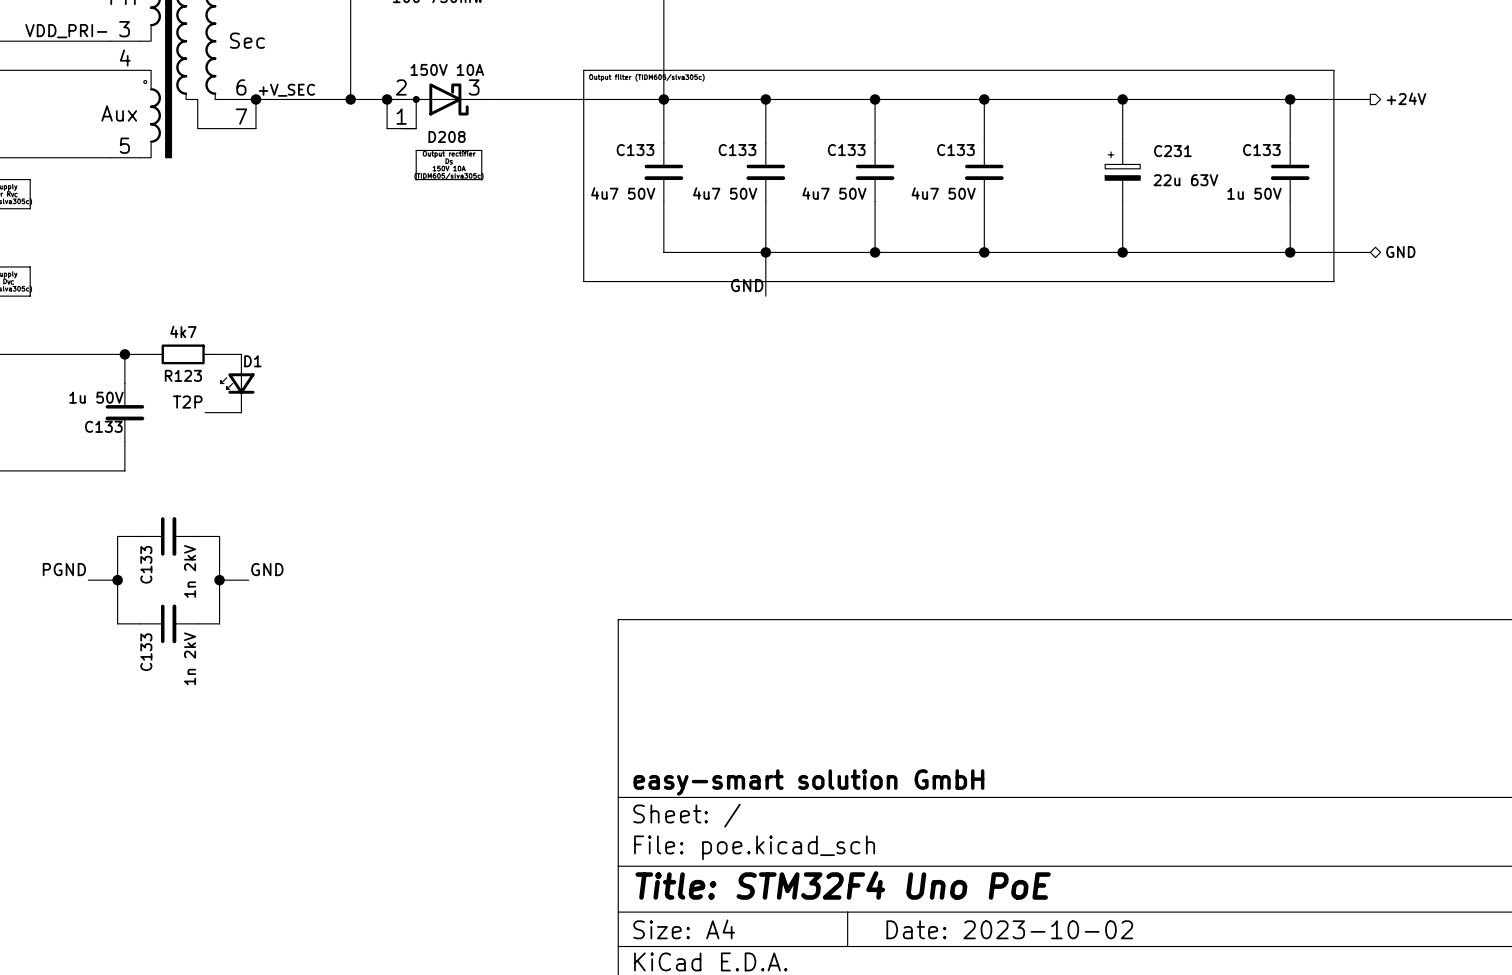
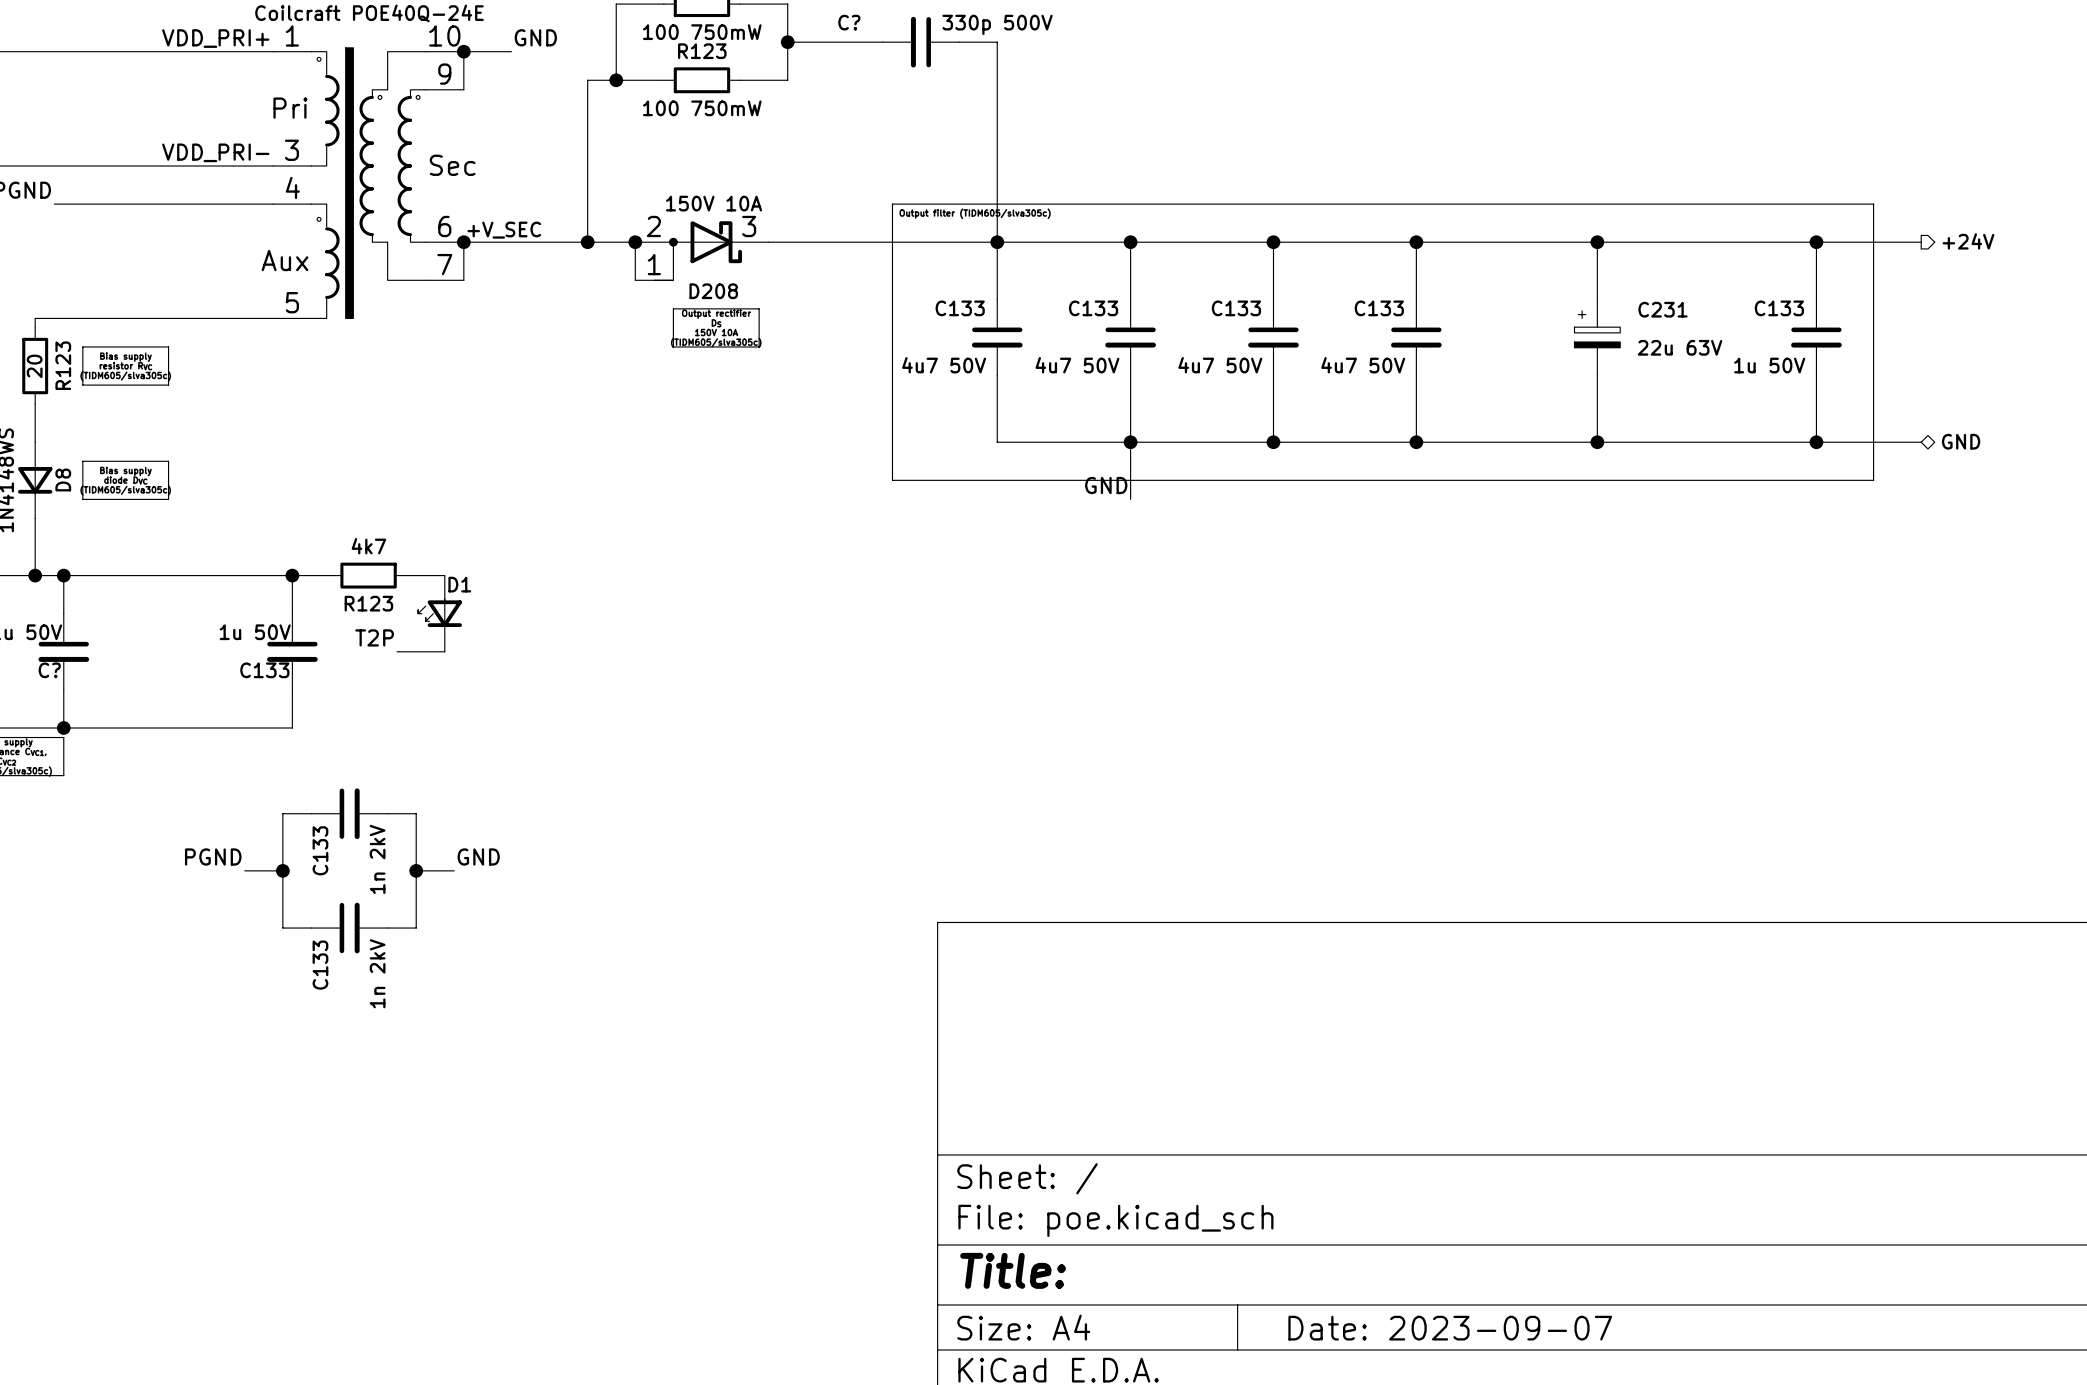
title block: easy-smart solution GmbH (808, 782) -> none
title block: Title: STM32F4 Uno PoE (843, 885) -> Title: (1013, 1270)
title block: Date: 2023-10-02 (1009, 929) -> Date: 2023-09-07 (1450, 1328)

